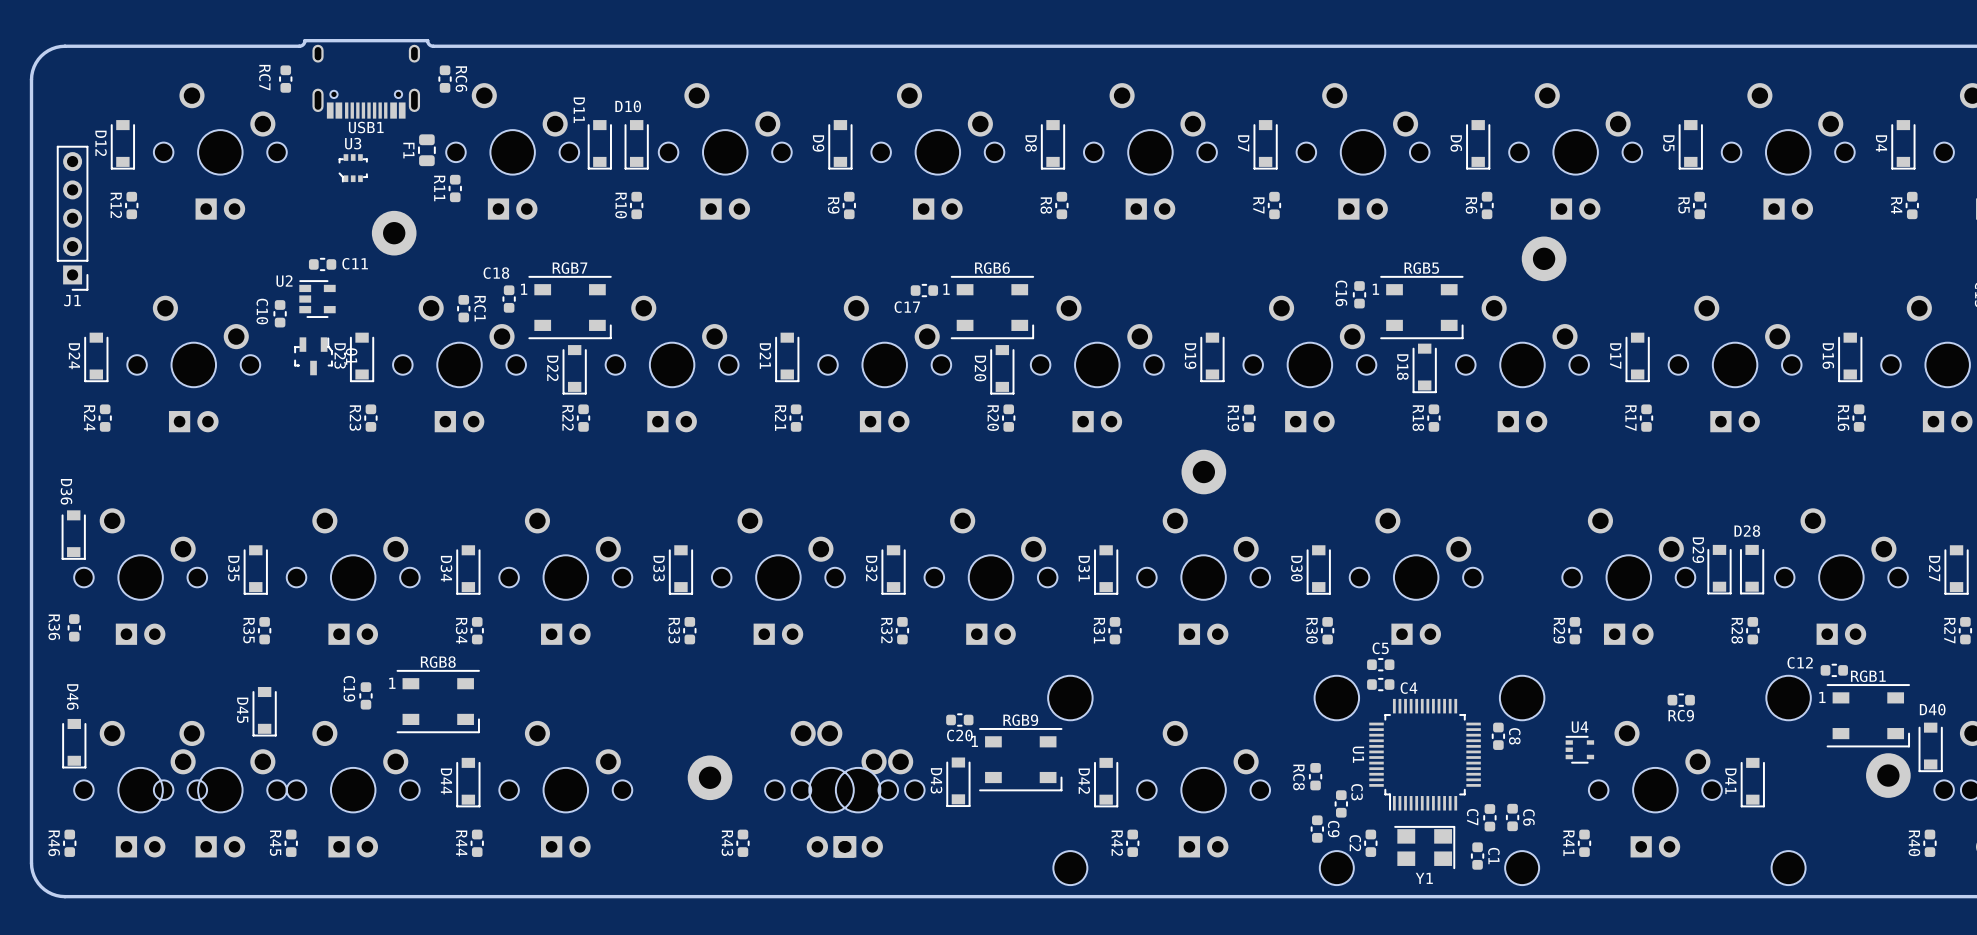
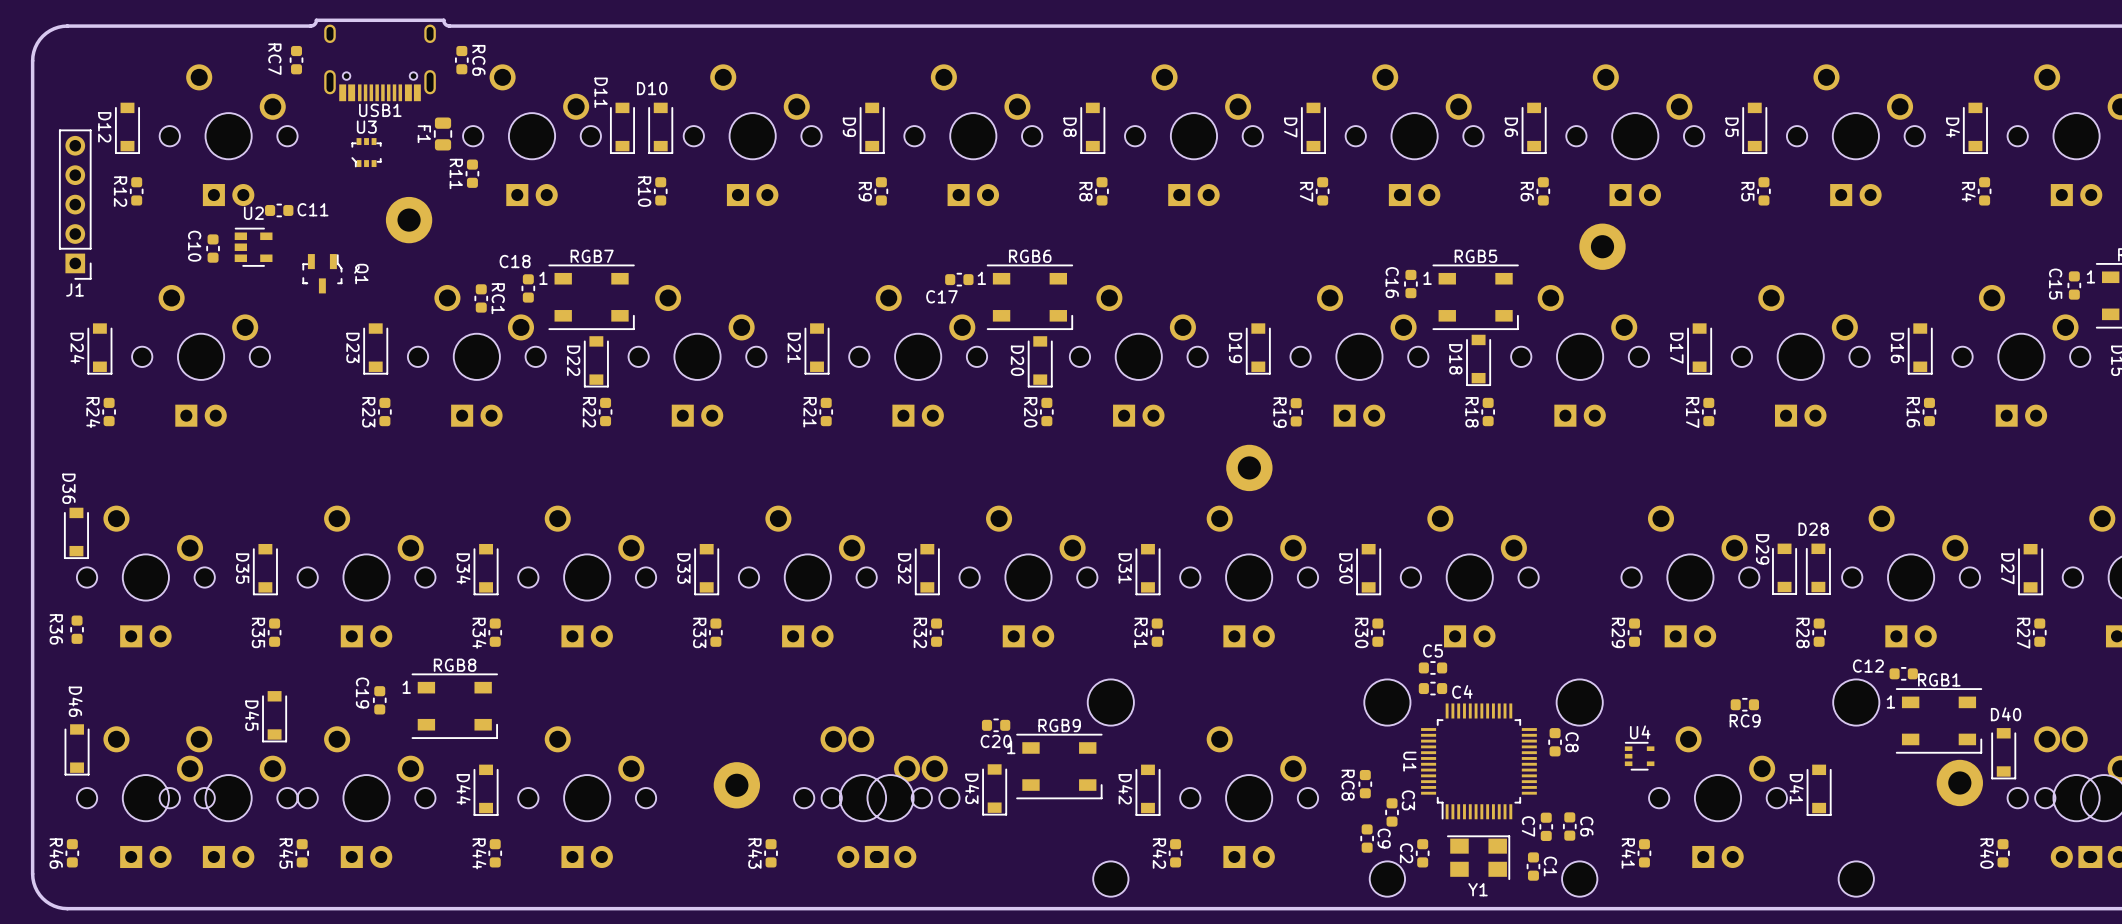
C11 position: (322, 264) -> (279, 210)
U2 name position: U2 (284, 281) -> U2 (253, 213)
U2 position: (317, 299) -> (253, 247)
C10 position: (280, 313) -> (213, 248)
Q1 position: (313, 356) -> (322, 273)

